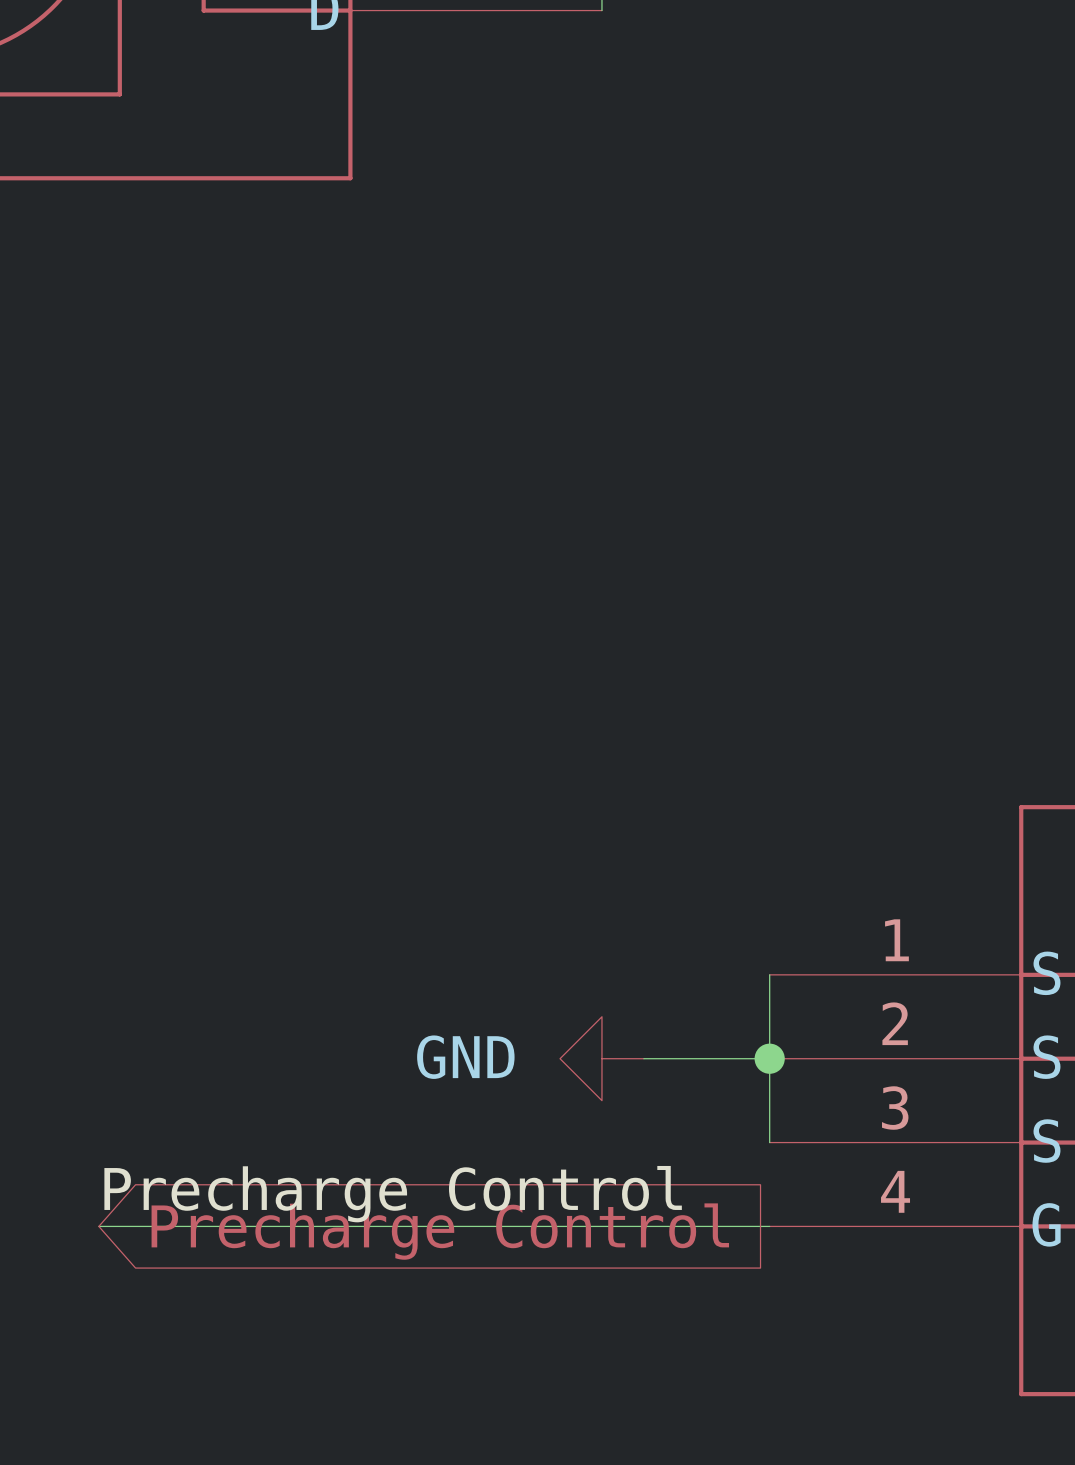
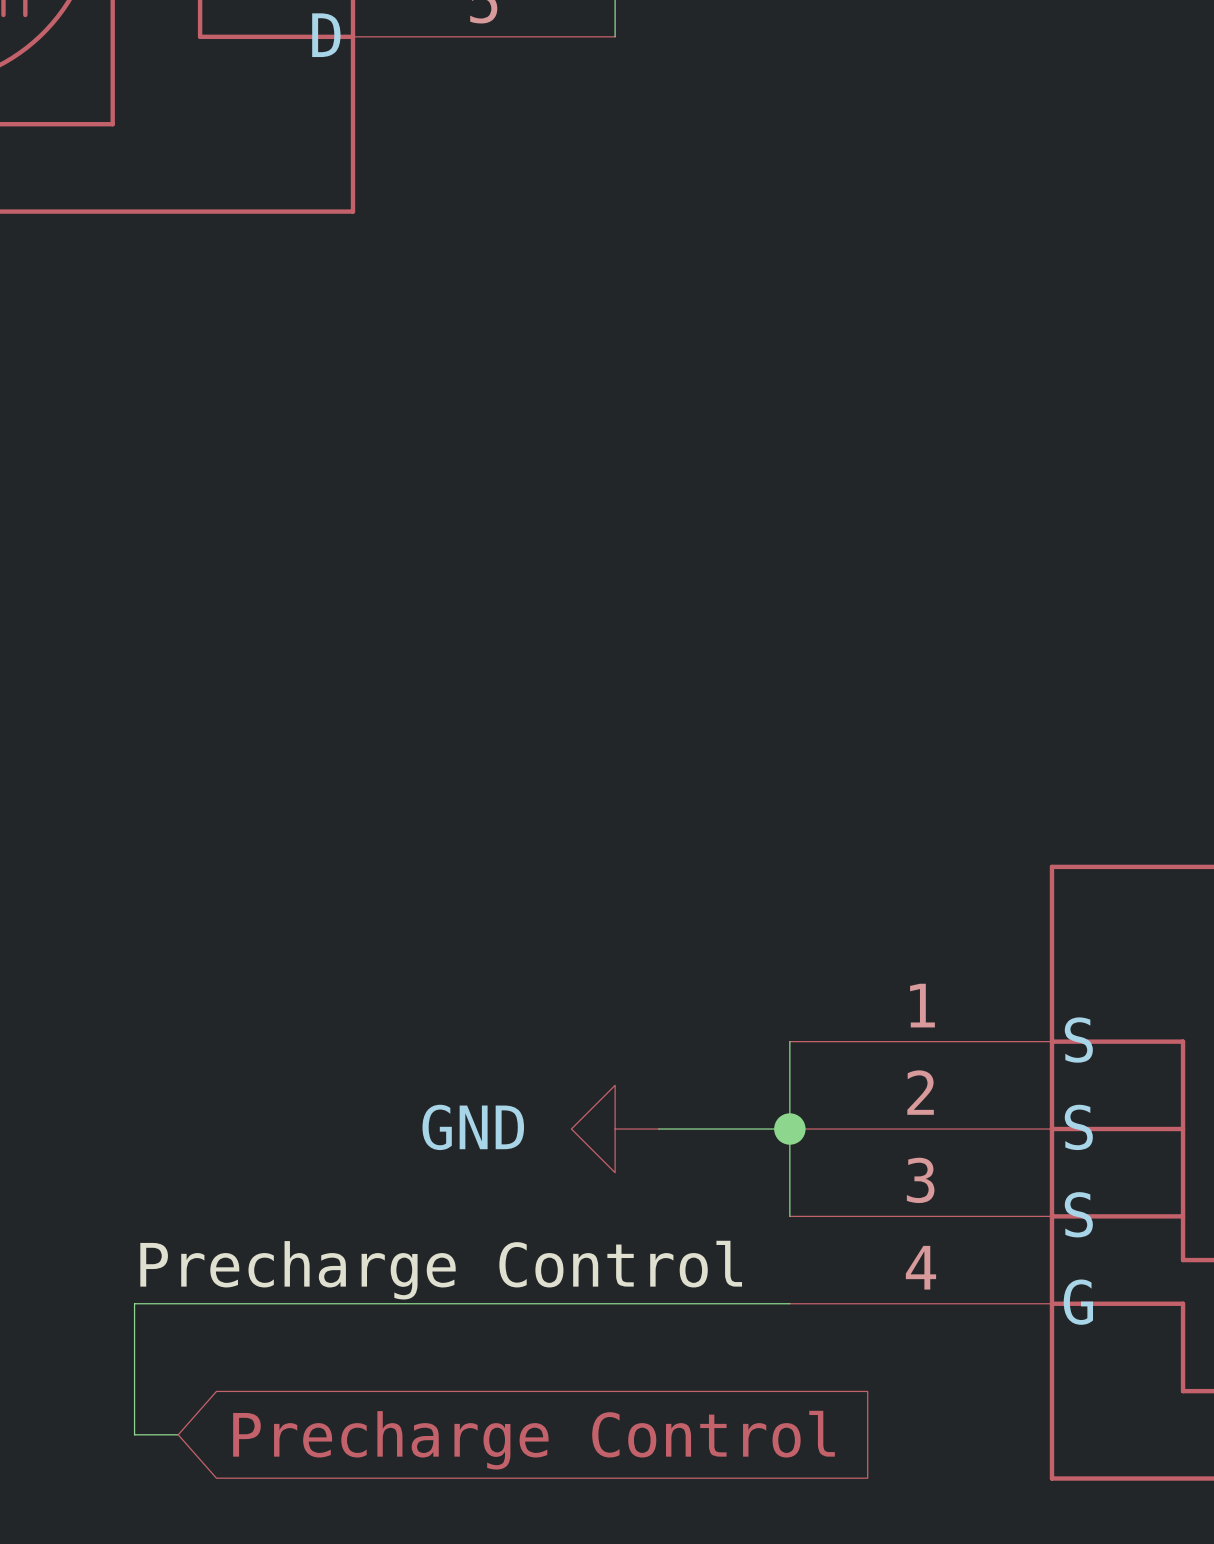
label position: Precharge Control (393, 1194) -> Precharge Control (441, 1270)
wire: (98, 1226) (140, 1226) -> (178, 1434) (134, 1434) (134, 1303)
global label position: Precharge Control (440, 1231) -> Precharge Control (534, 1440)

